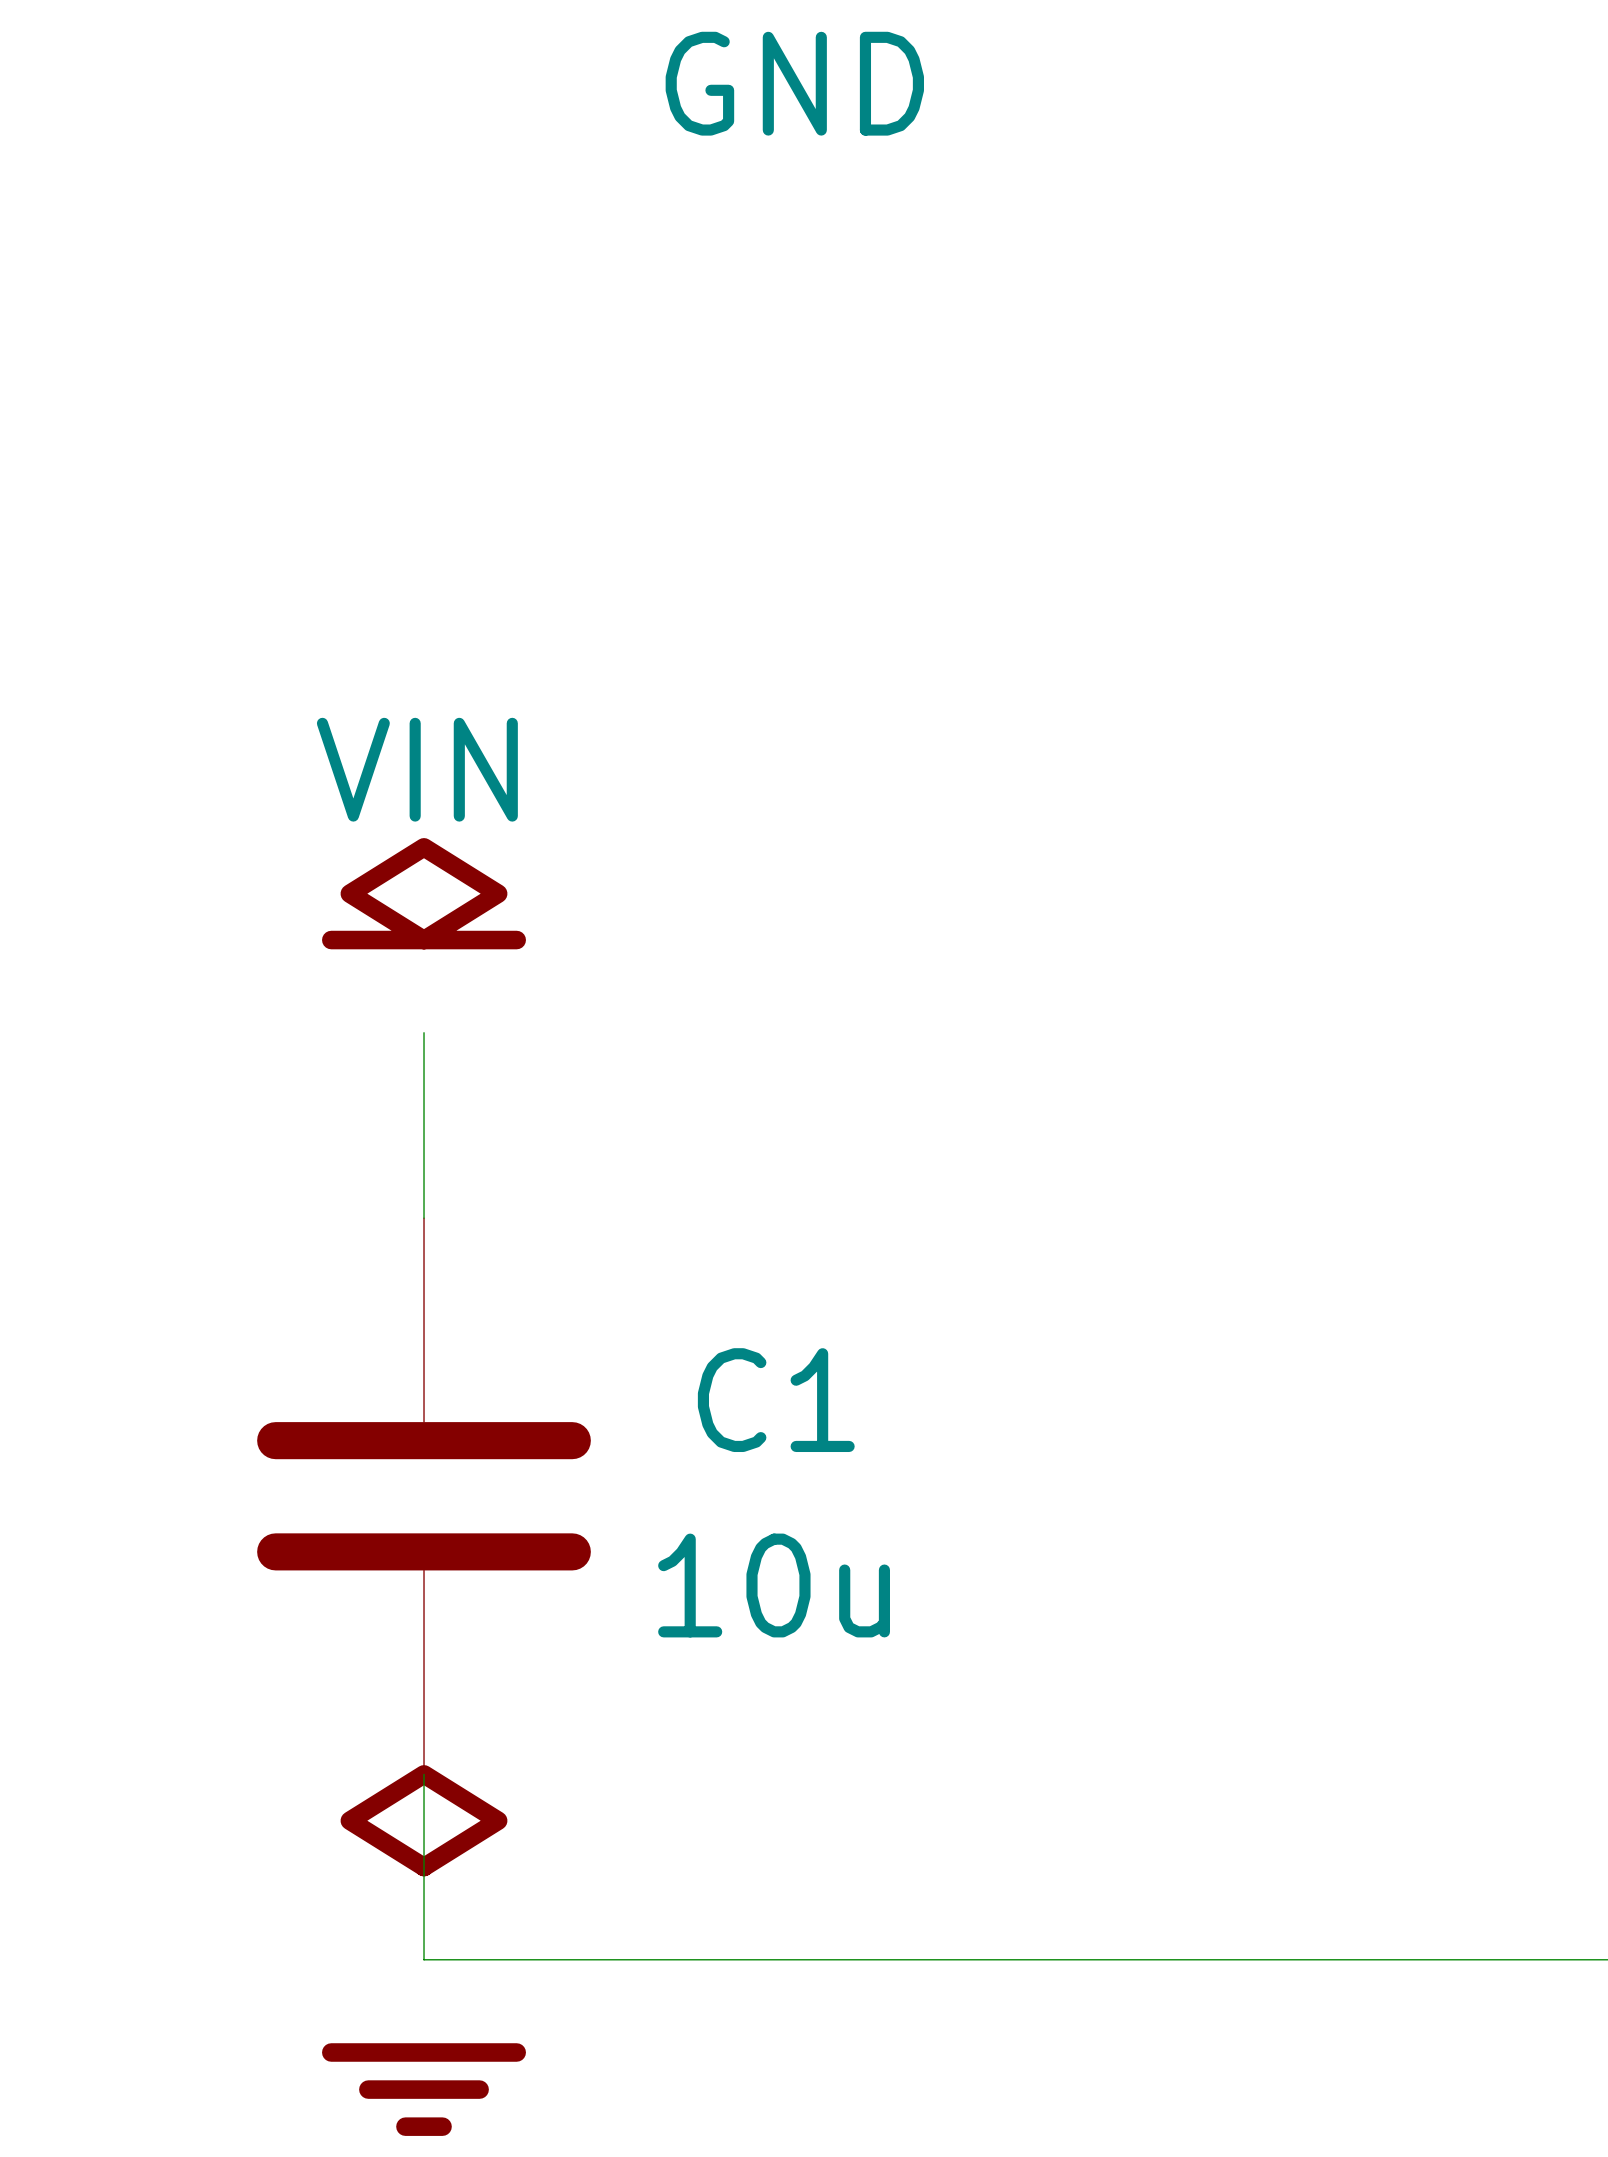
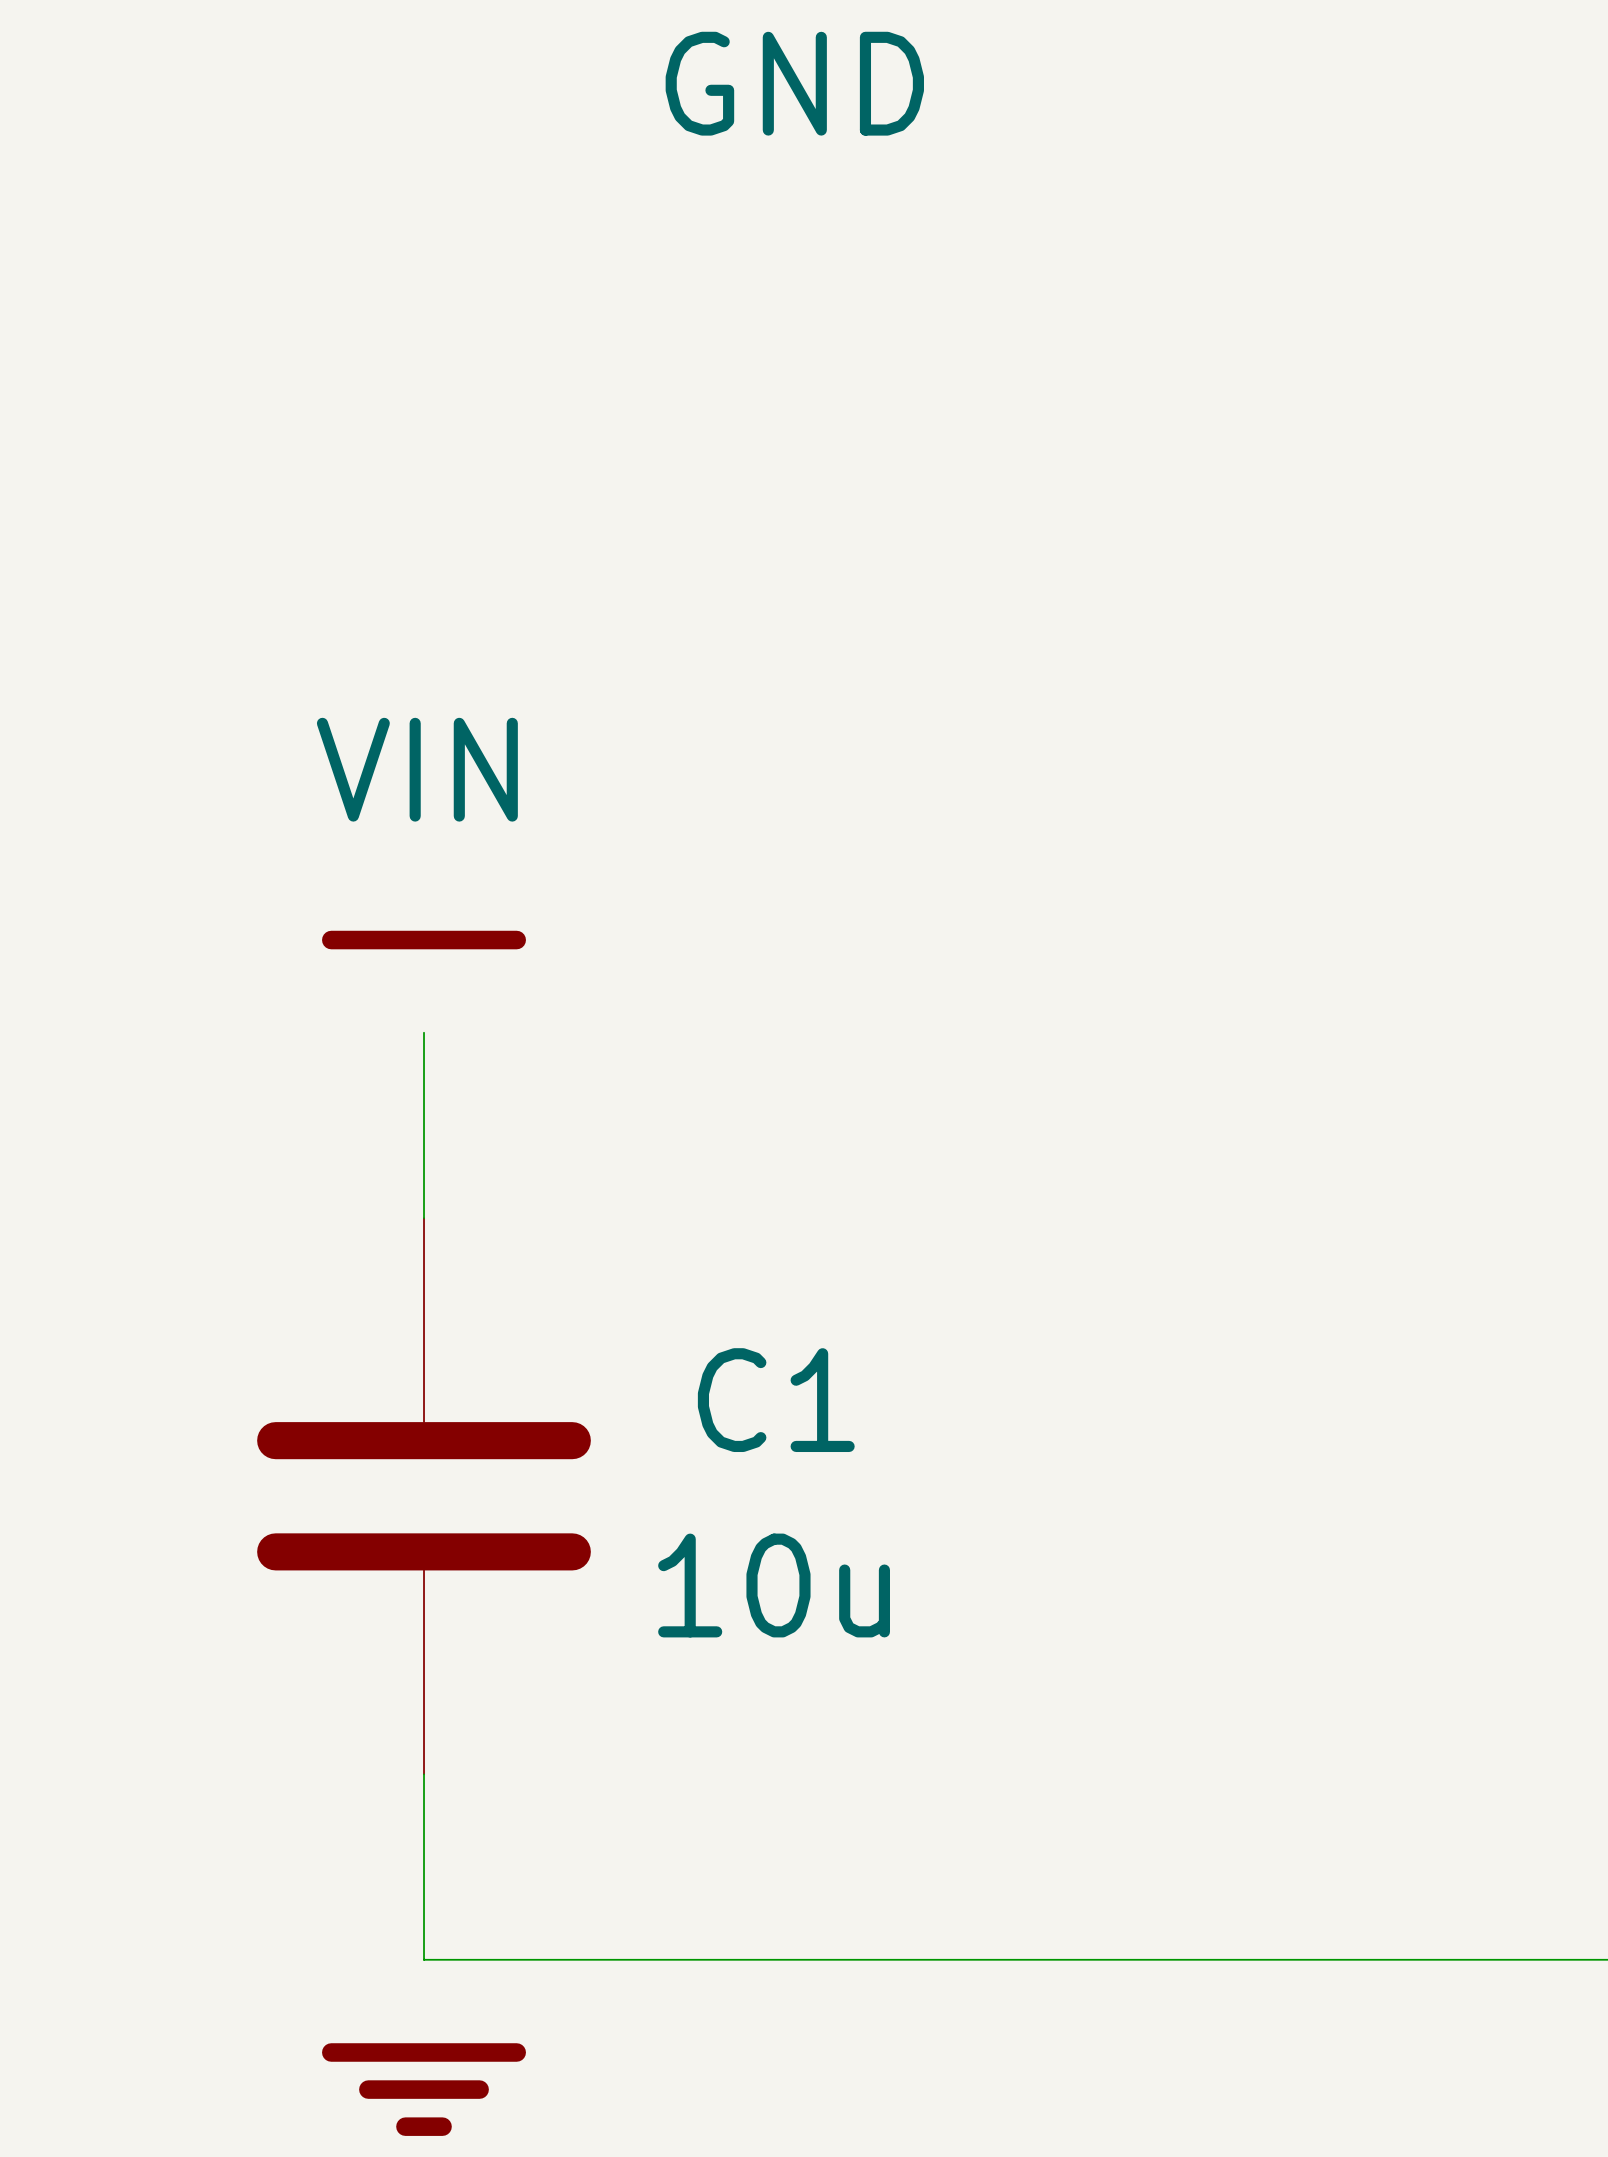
power symbol: (424, 893) -> none
power symbol: (424, 1820) -> none

